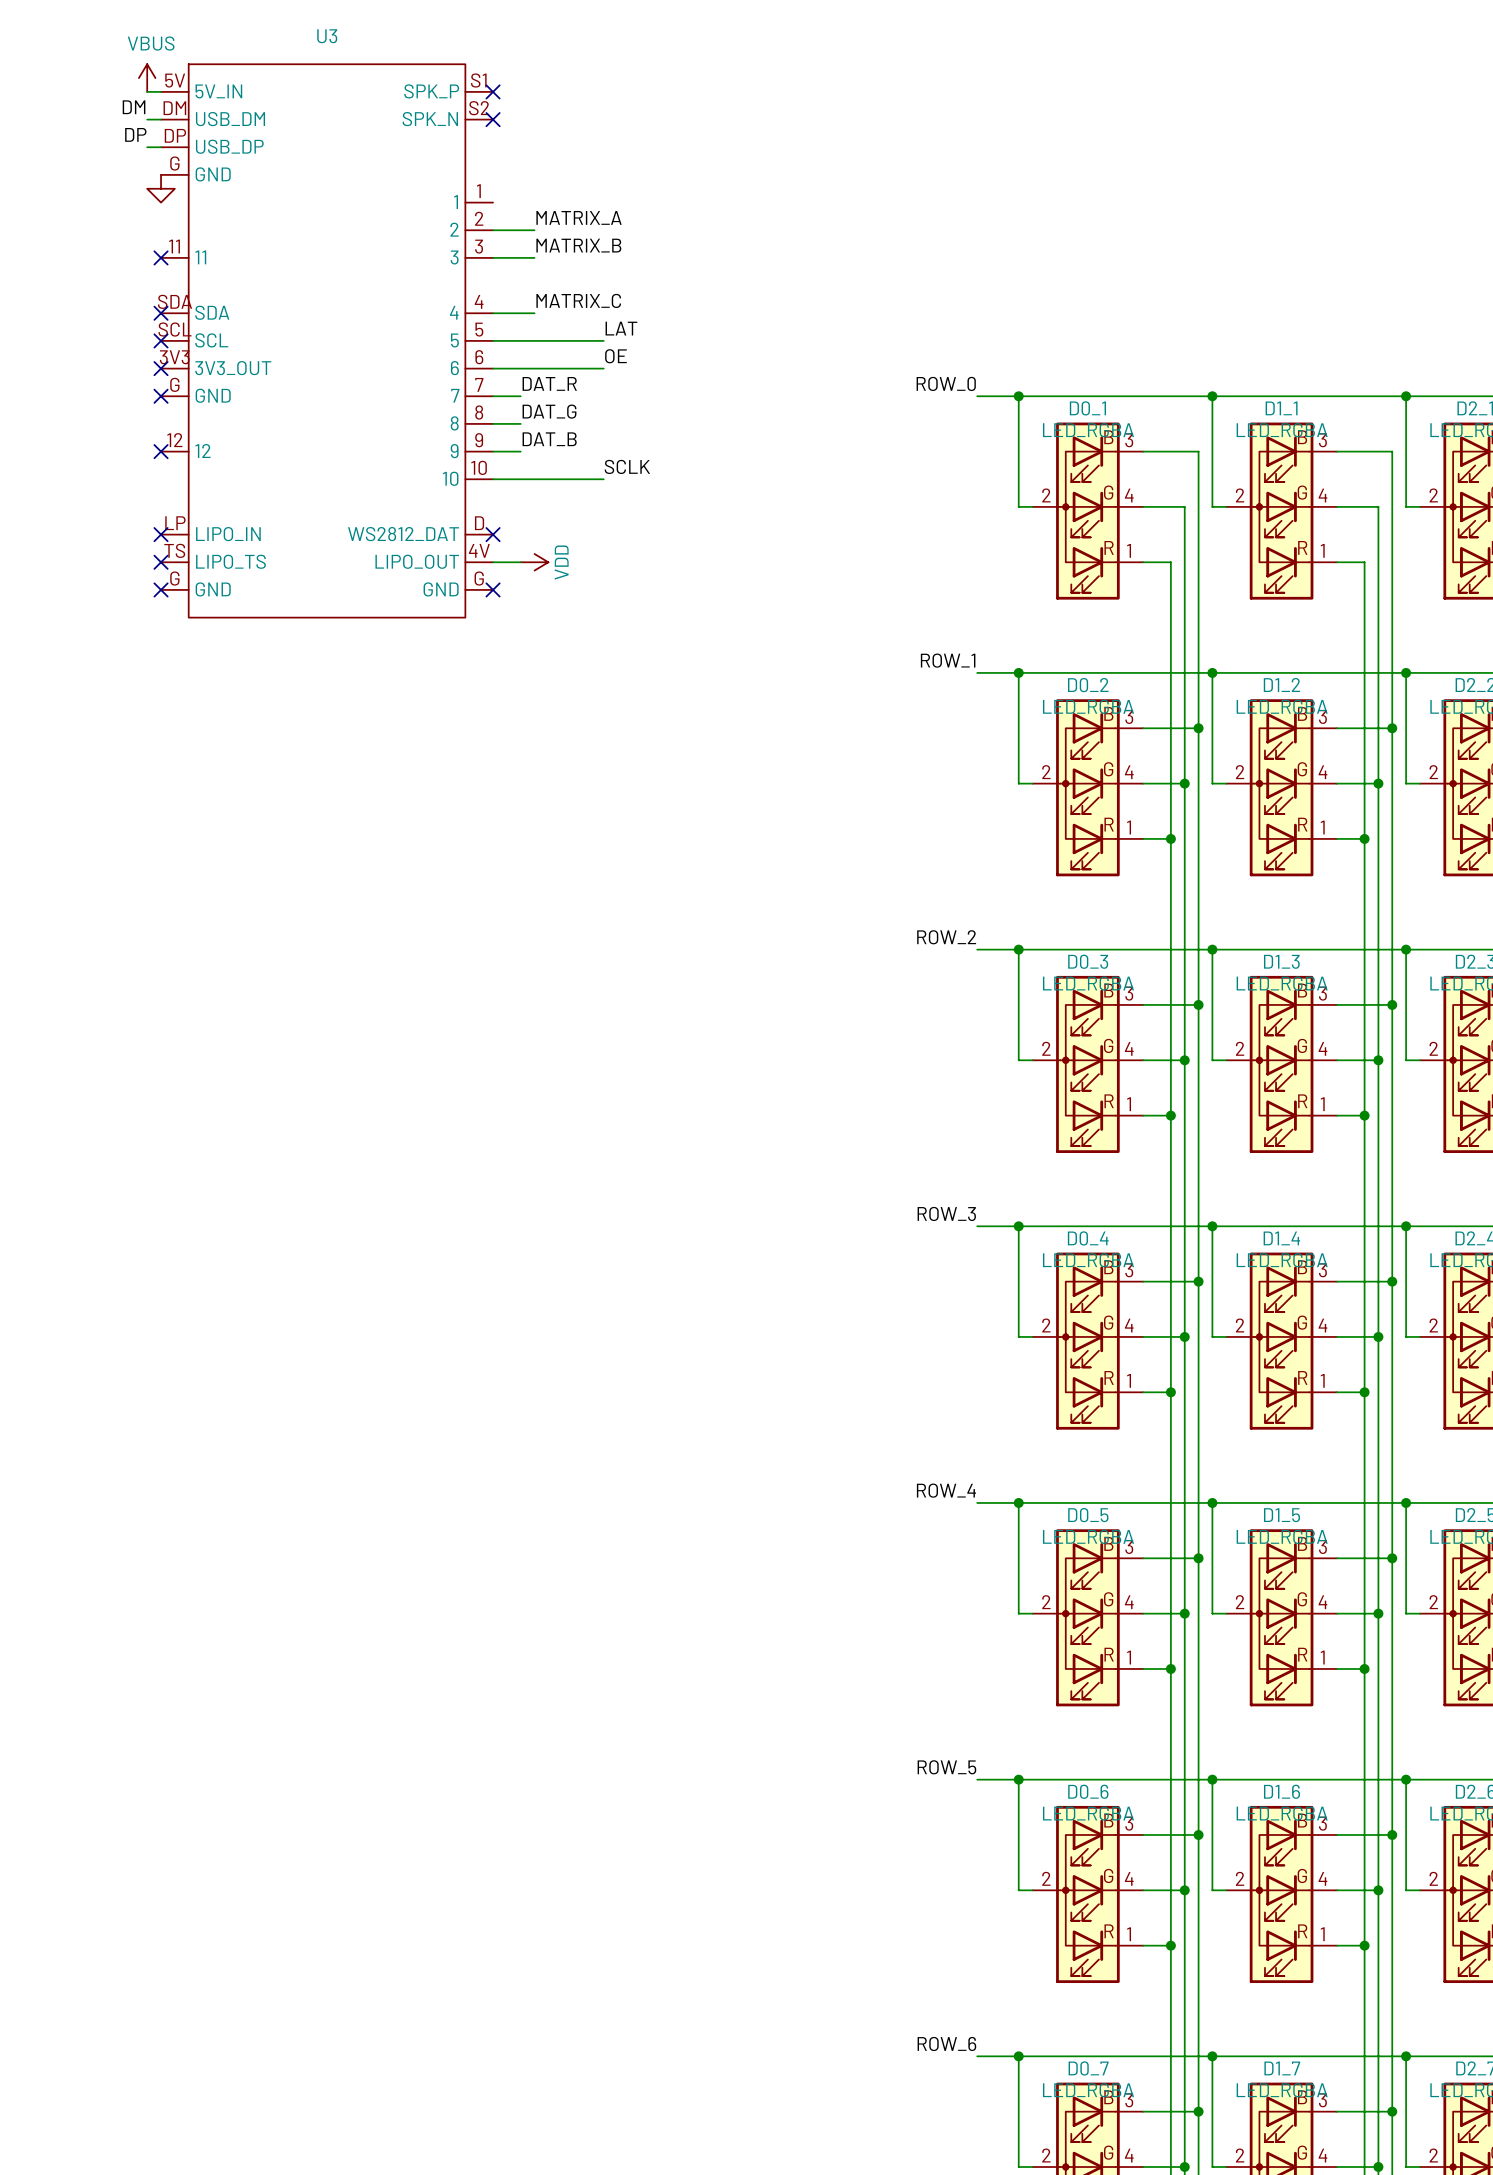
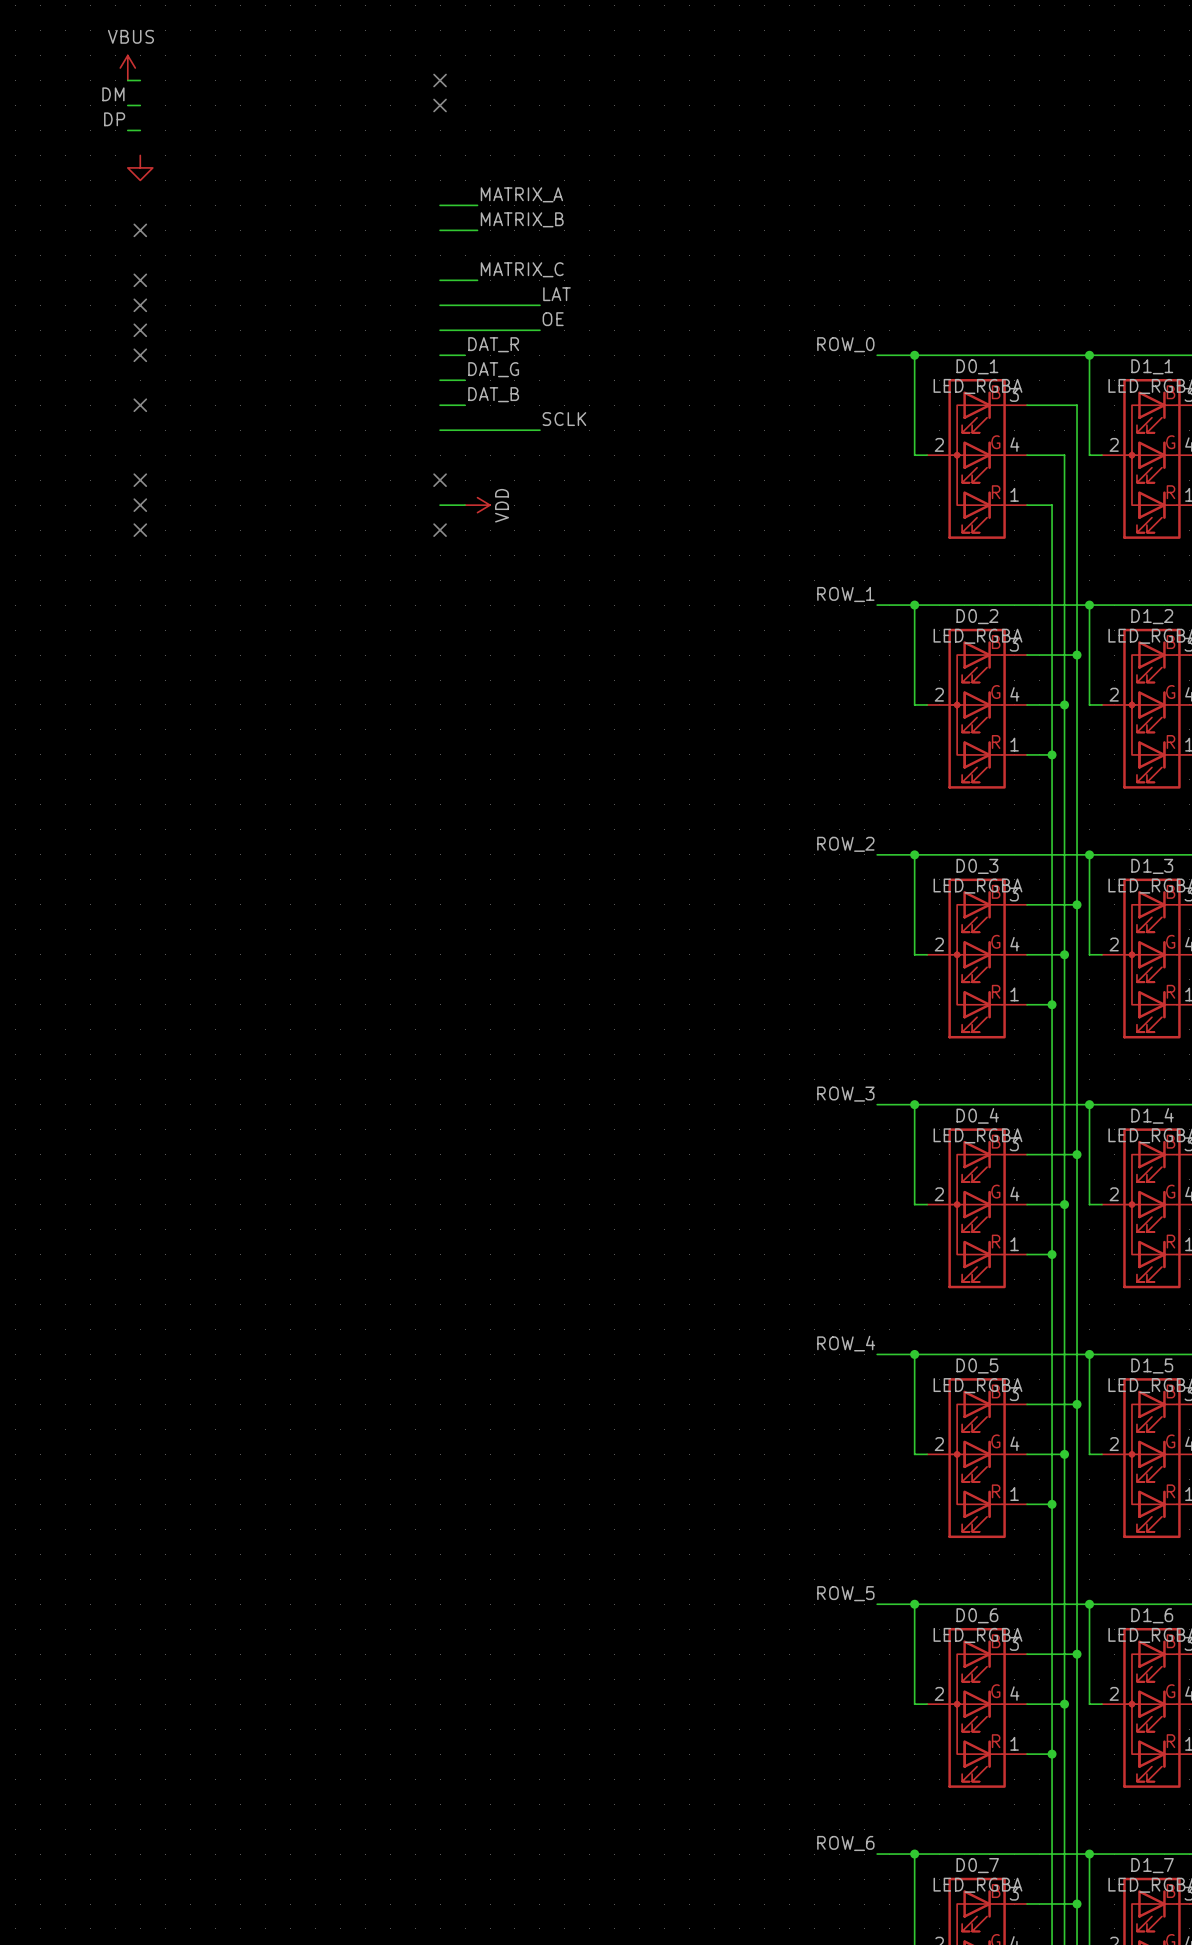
U3: (327, 340) -> none

